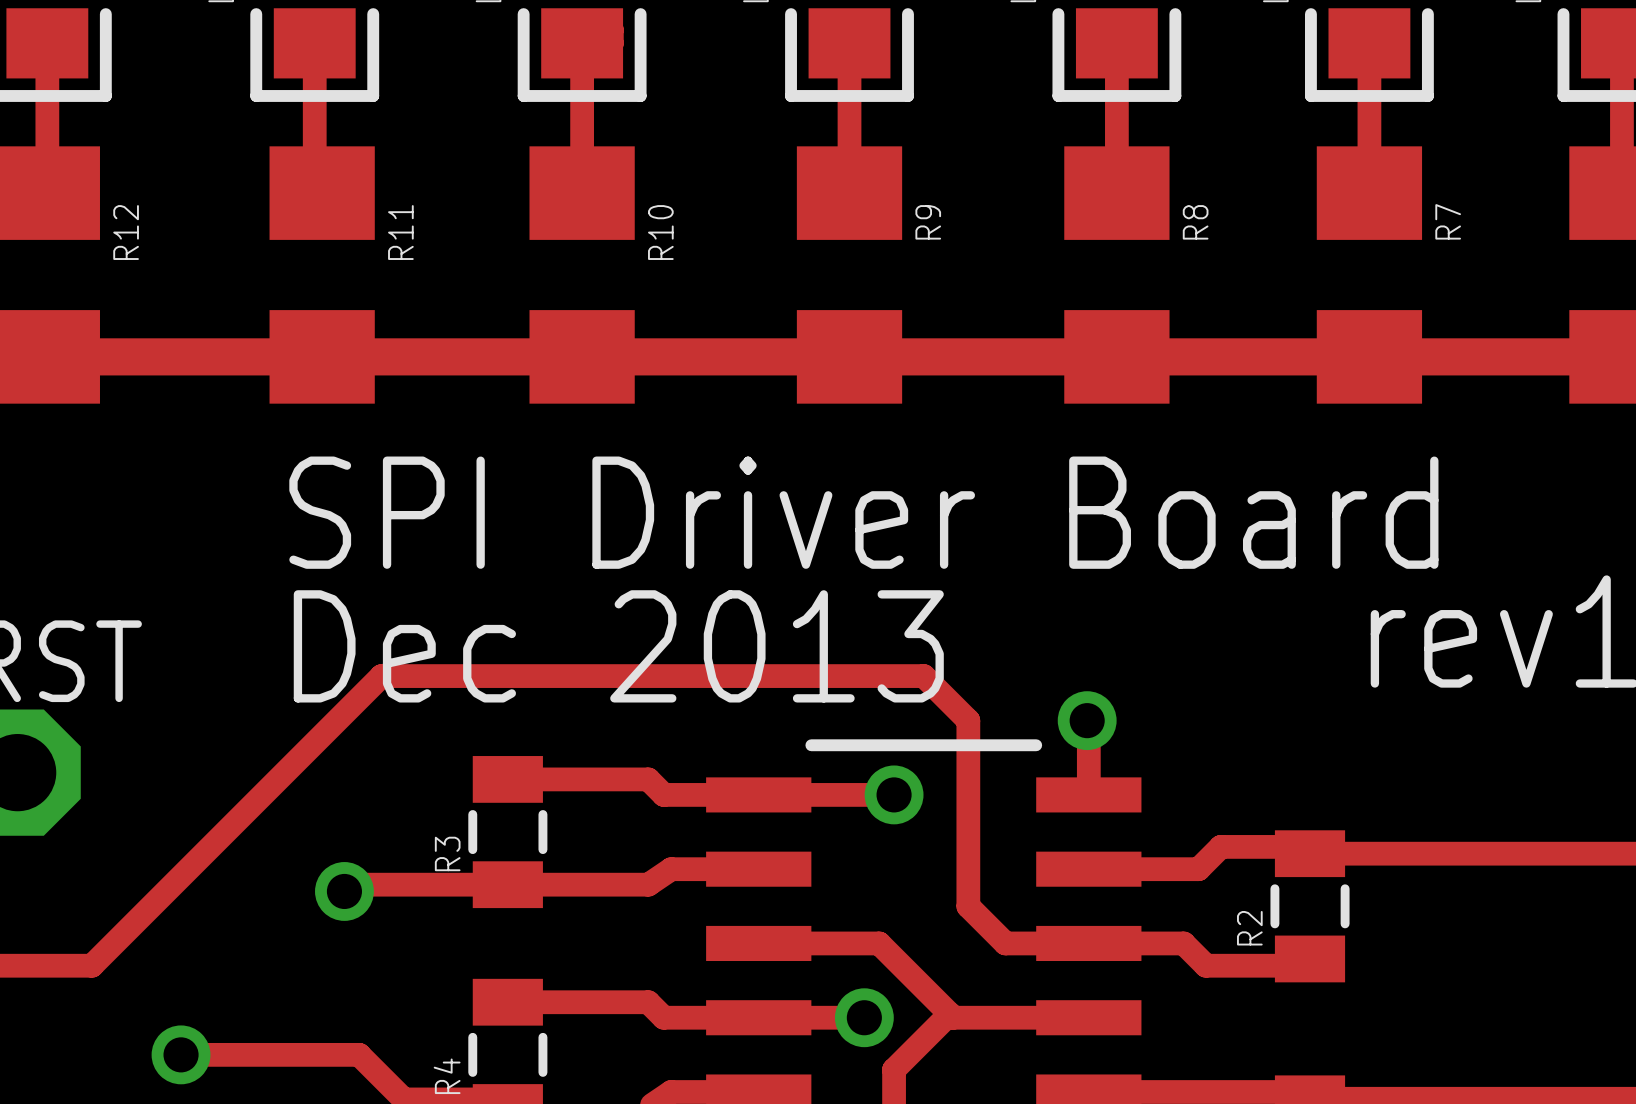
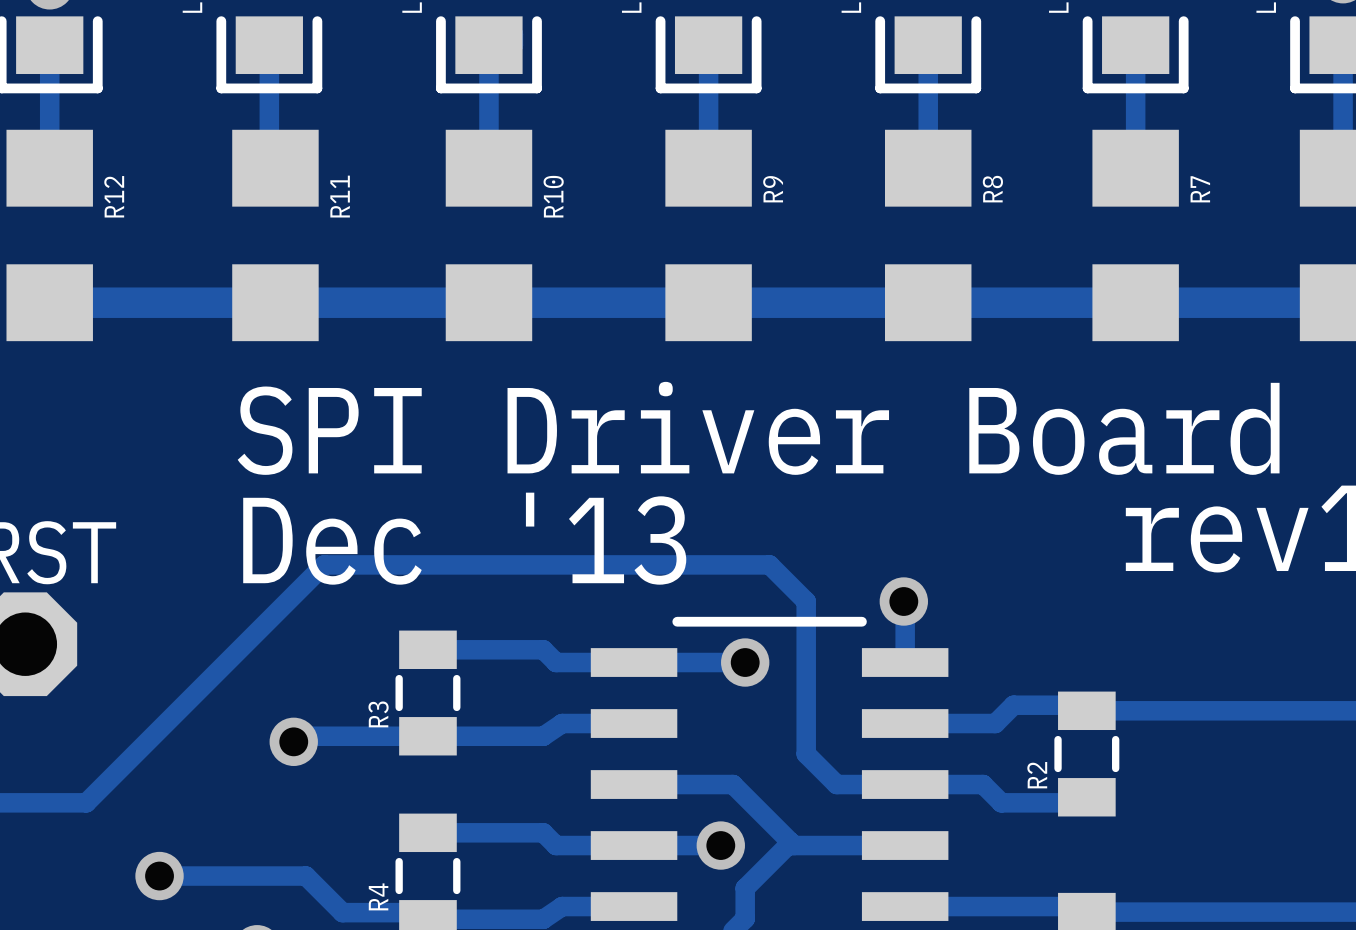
text: Dec 2013 (618, 646) -> Dec '13 (464, 538)

